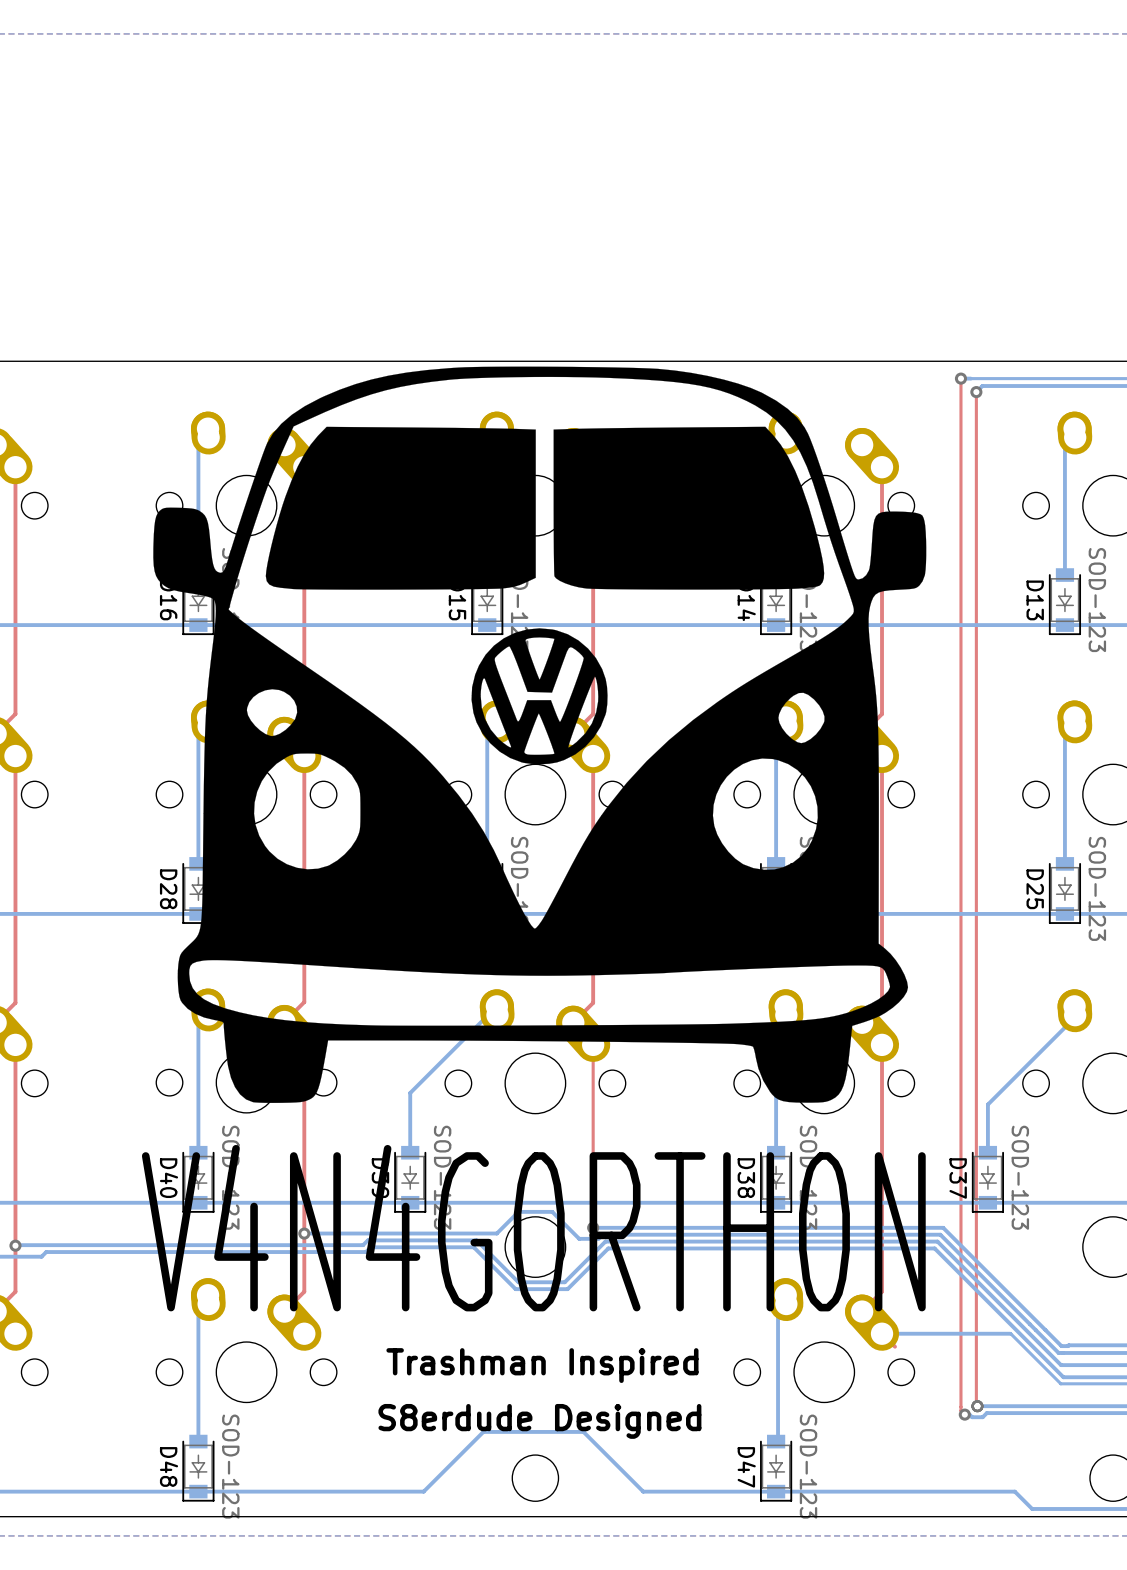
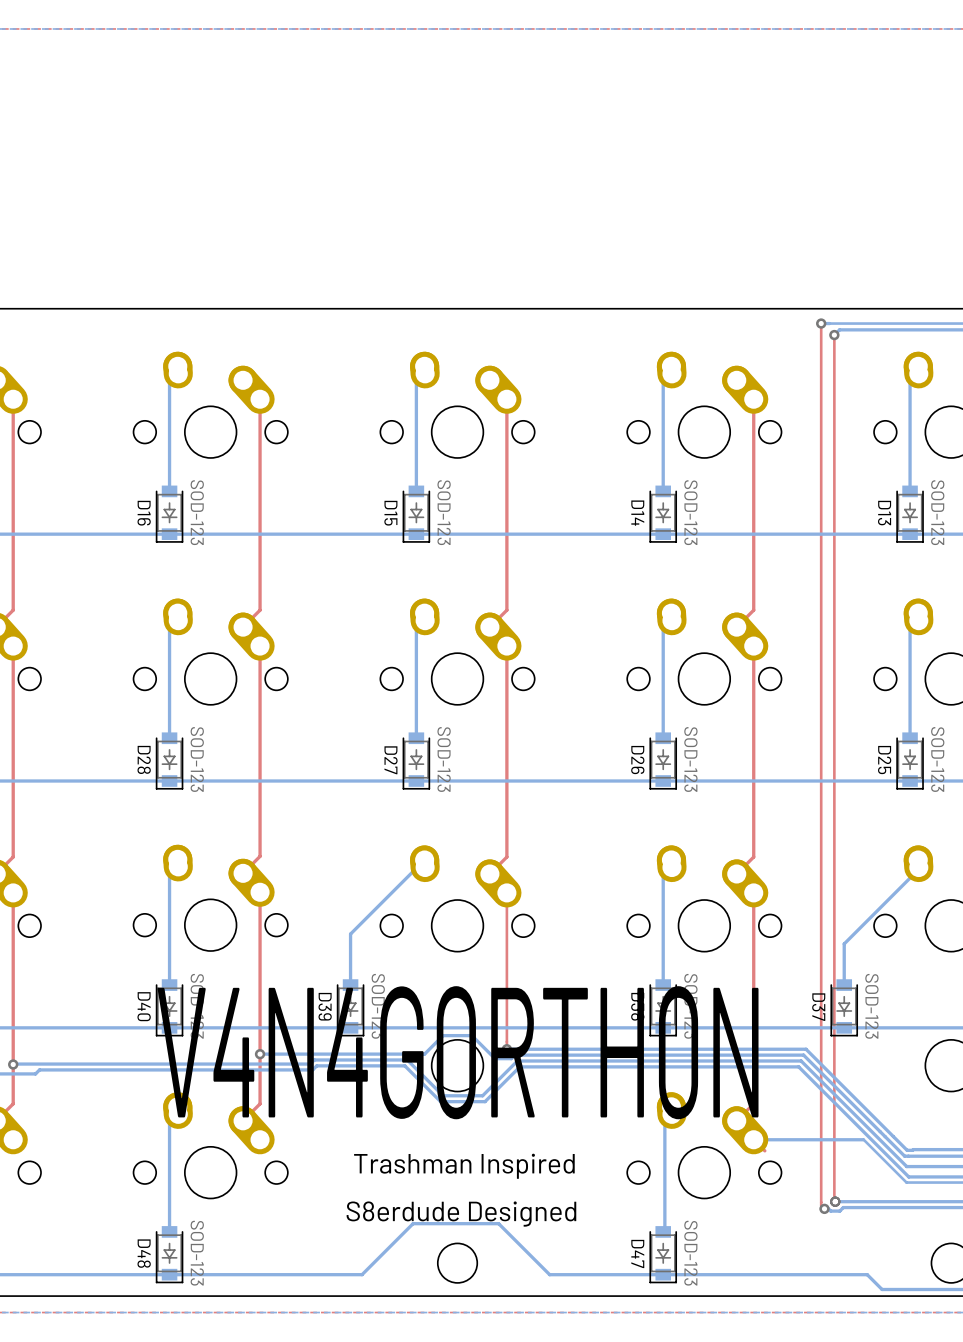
drawing: [153, 366, 927, 1103] -> none

